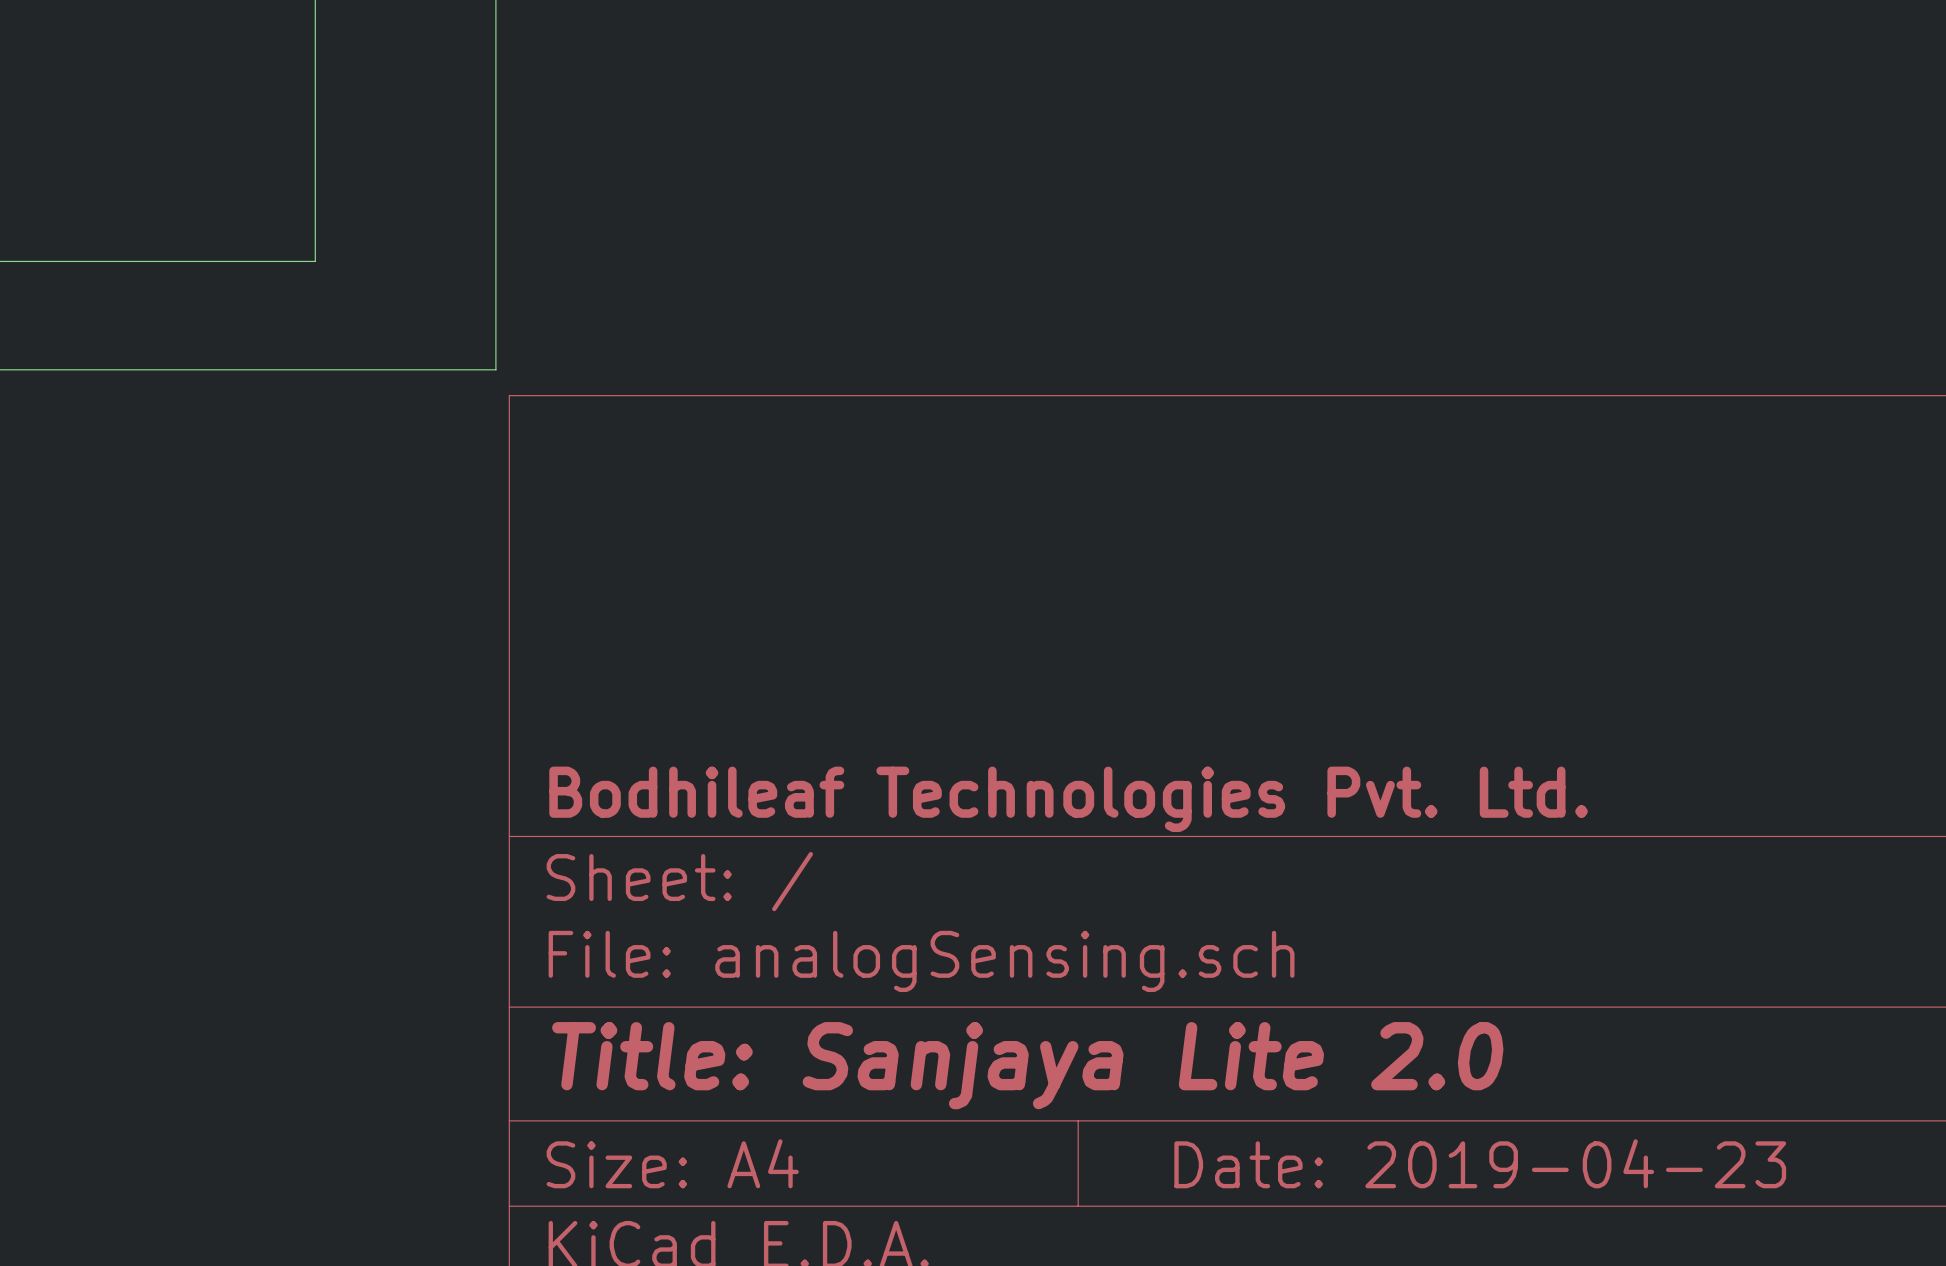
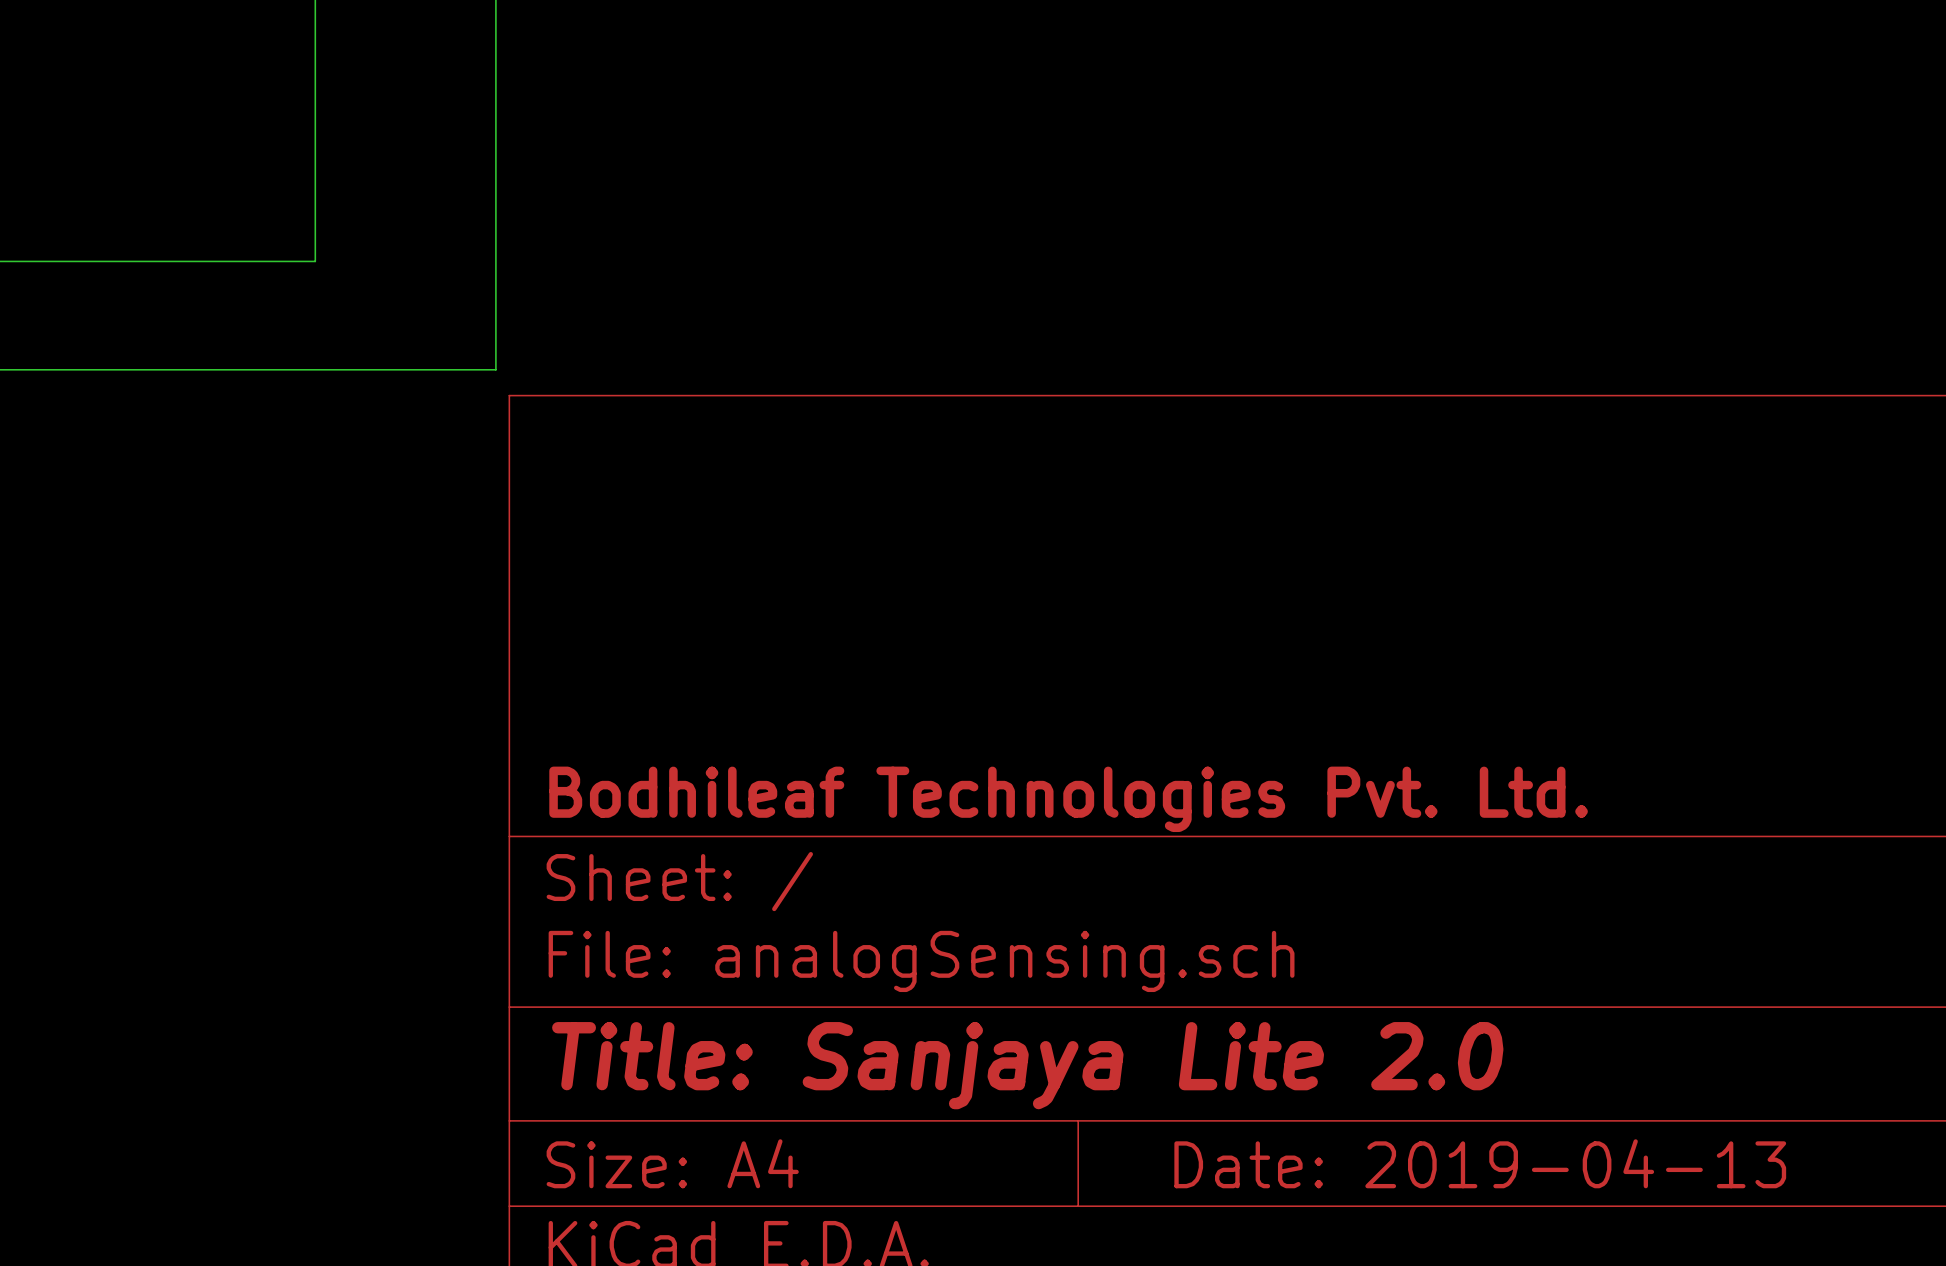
title block: Date: 2019-04-23 (1480, 1163) -> Date: 2019-04-13 (1480, 1163)

